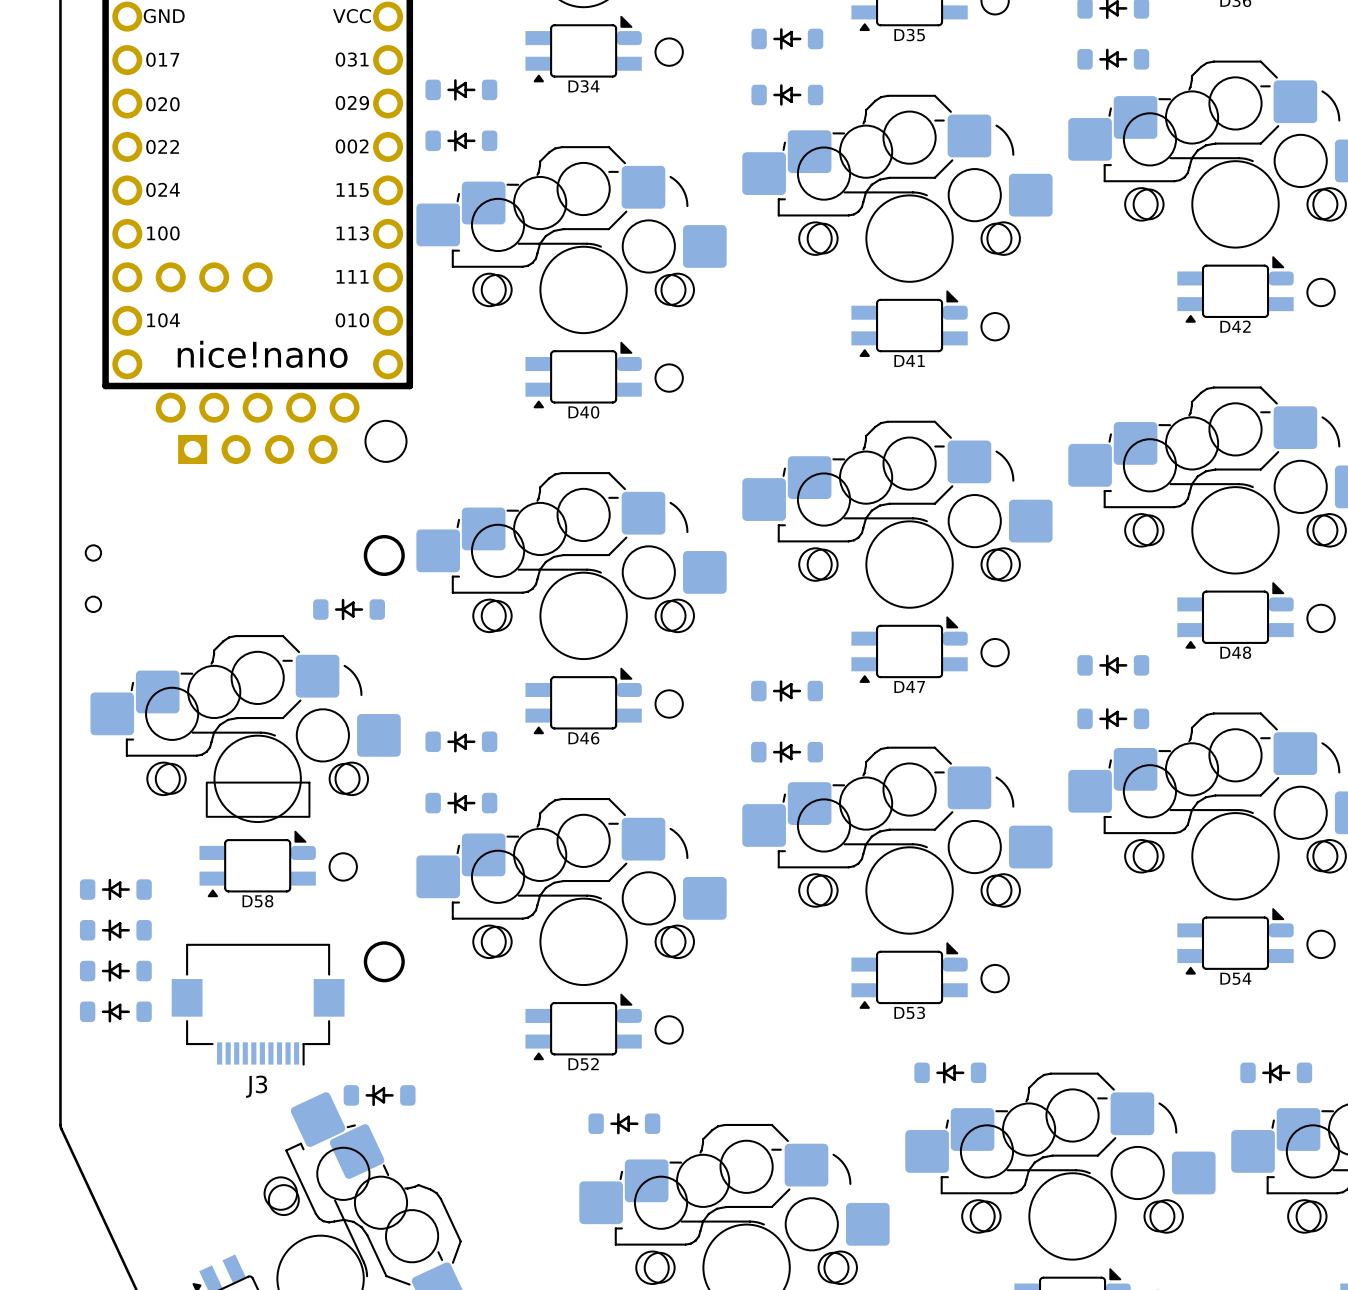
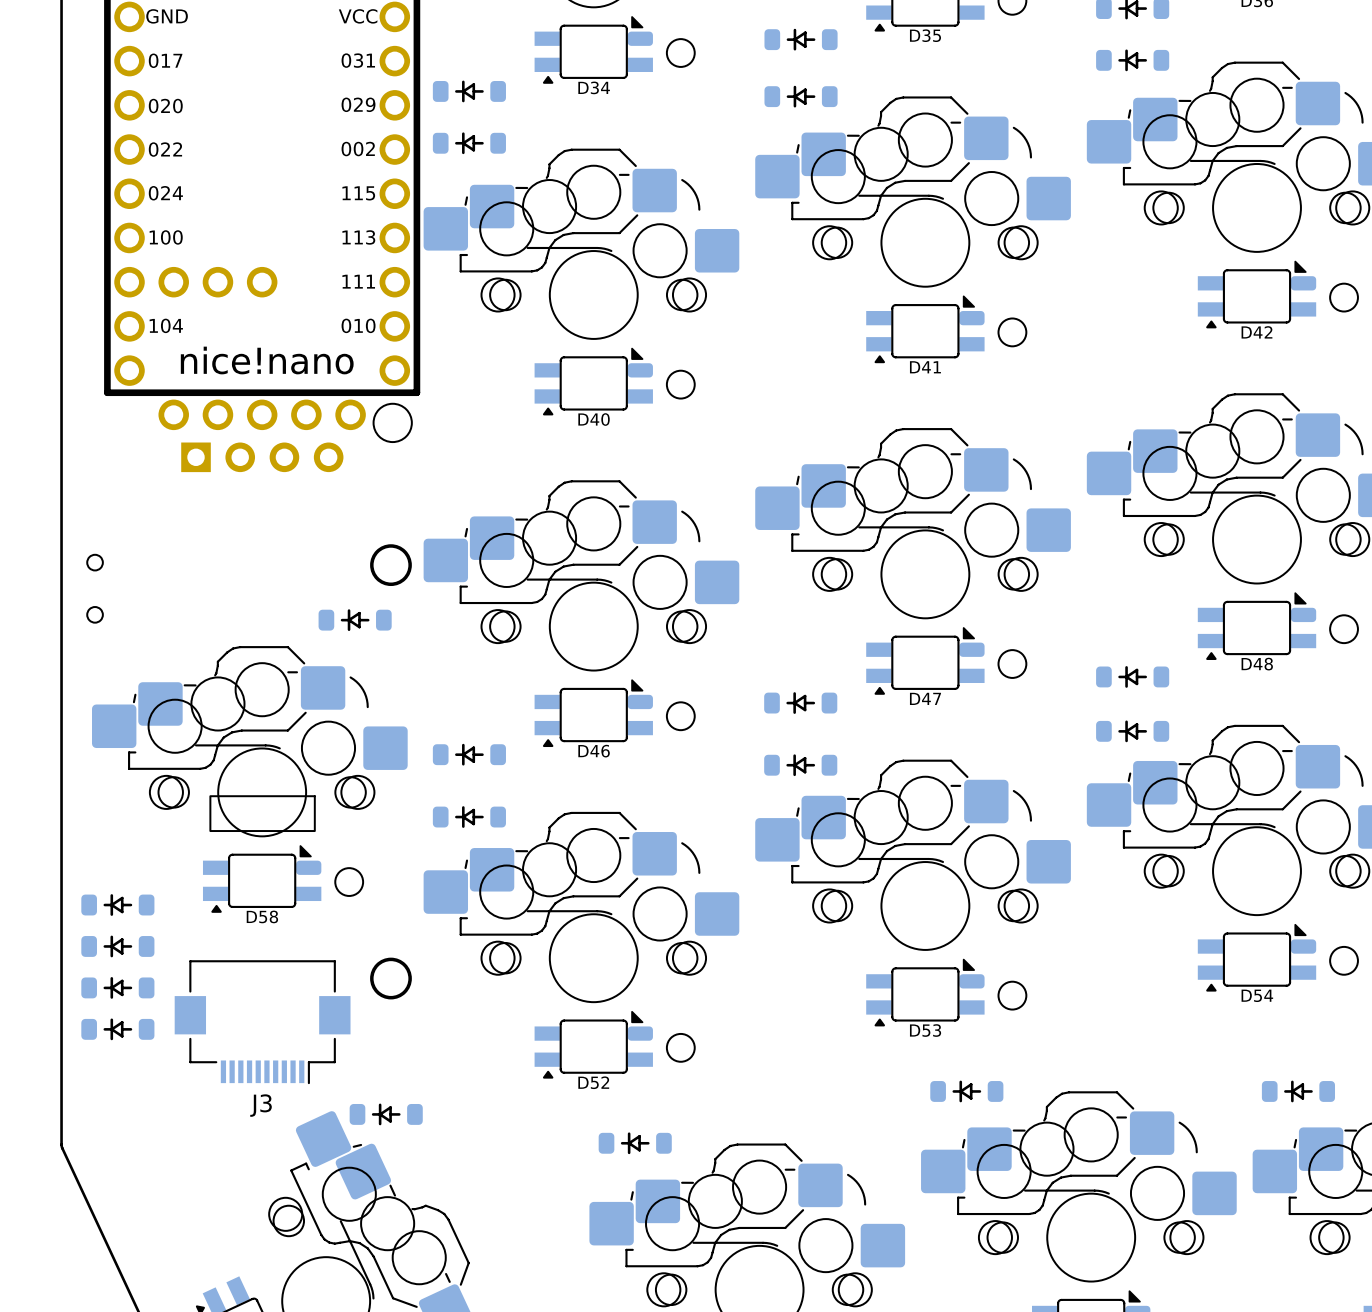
drawing: none -> [372, 402, 413, 443]
drawing: [364, 419, 408, 463] -> none

